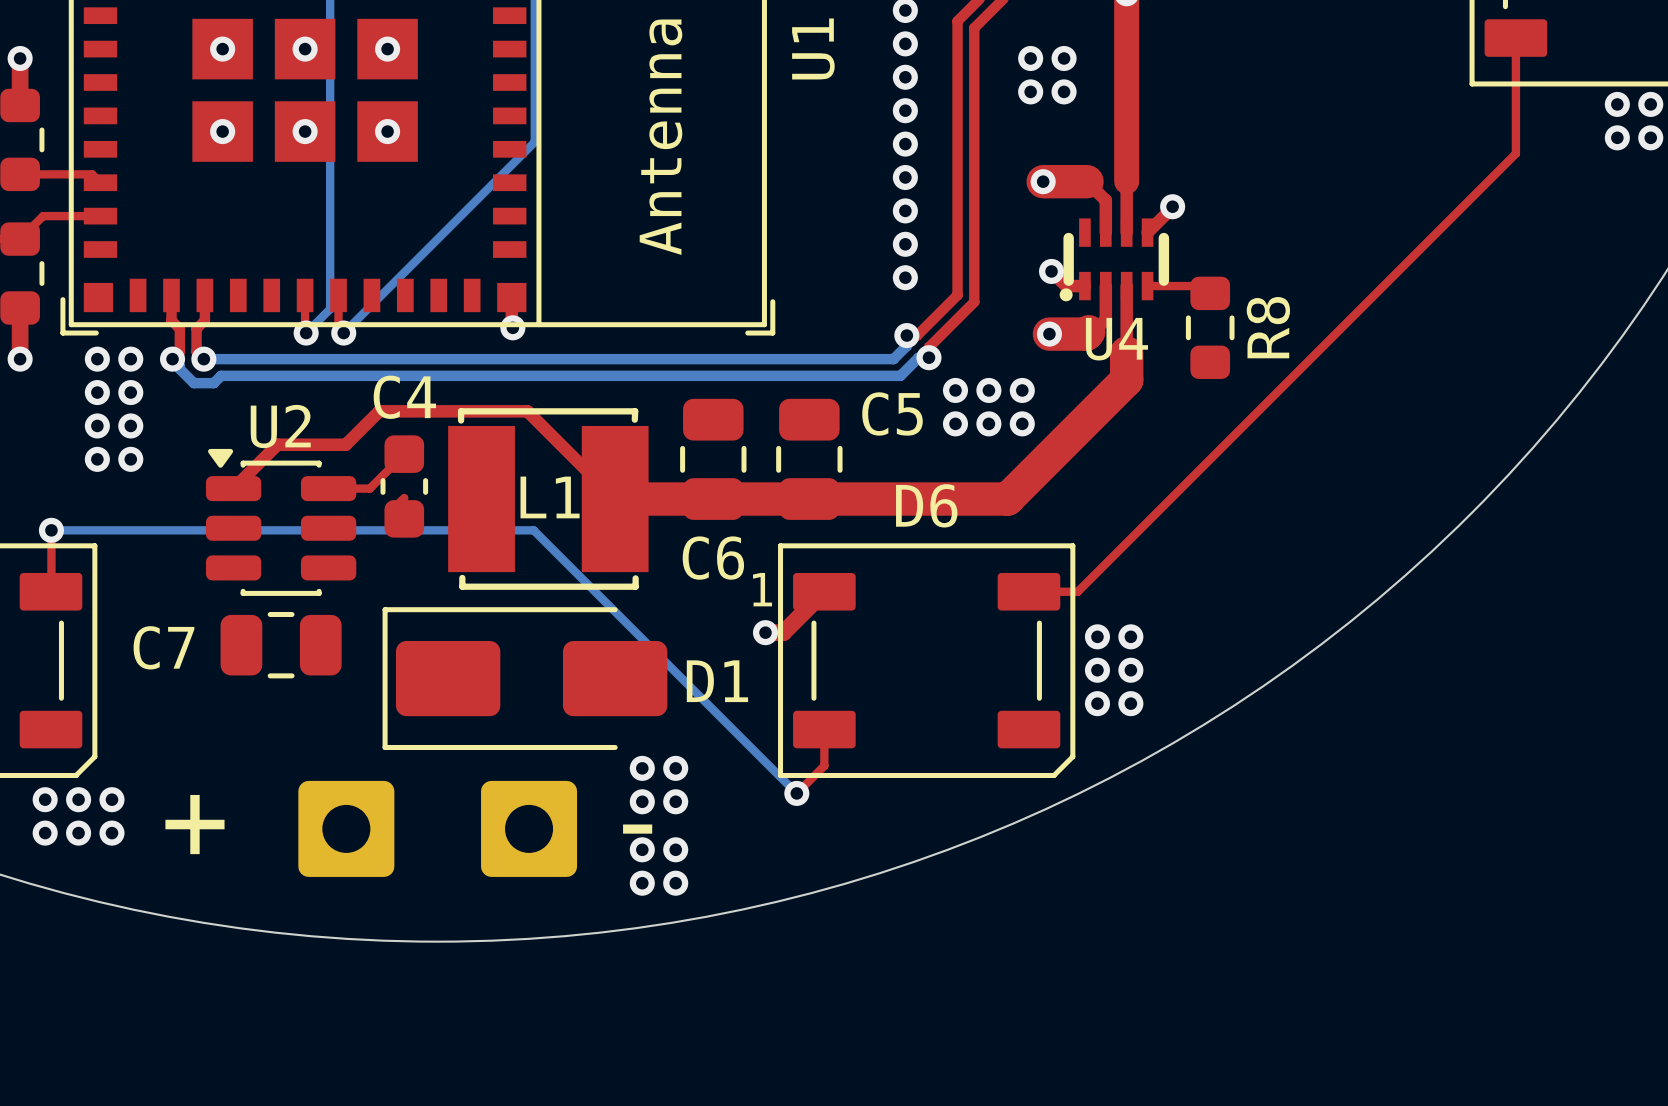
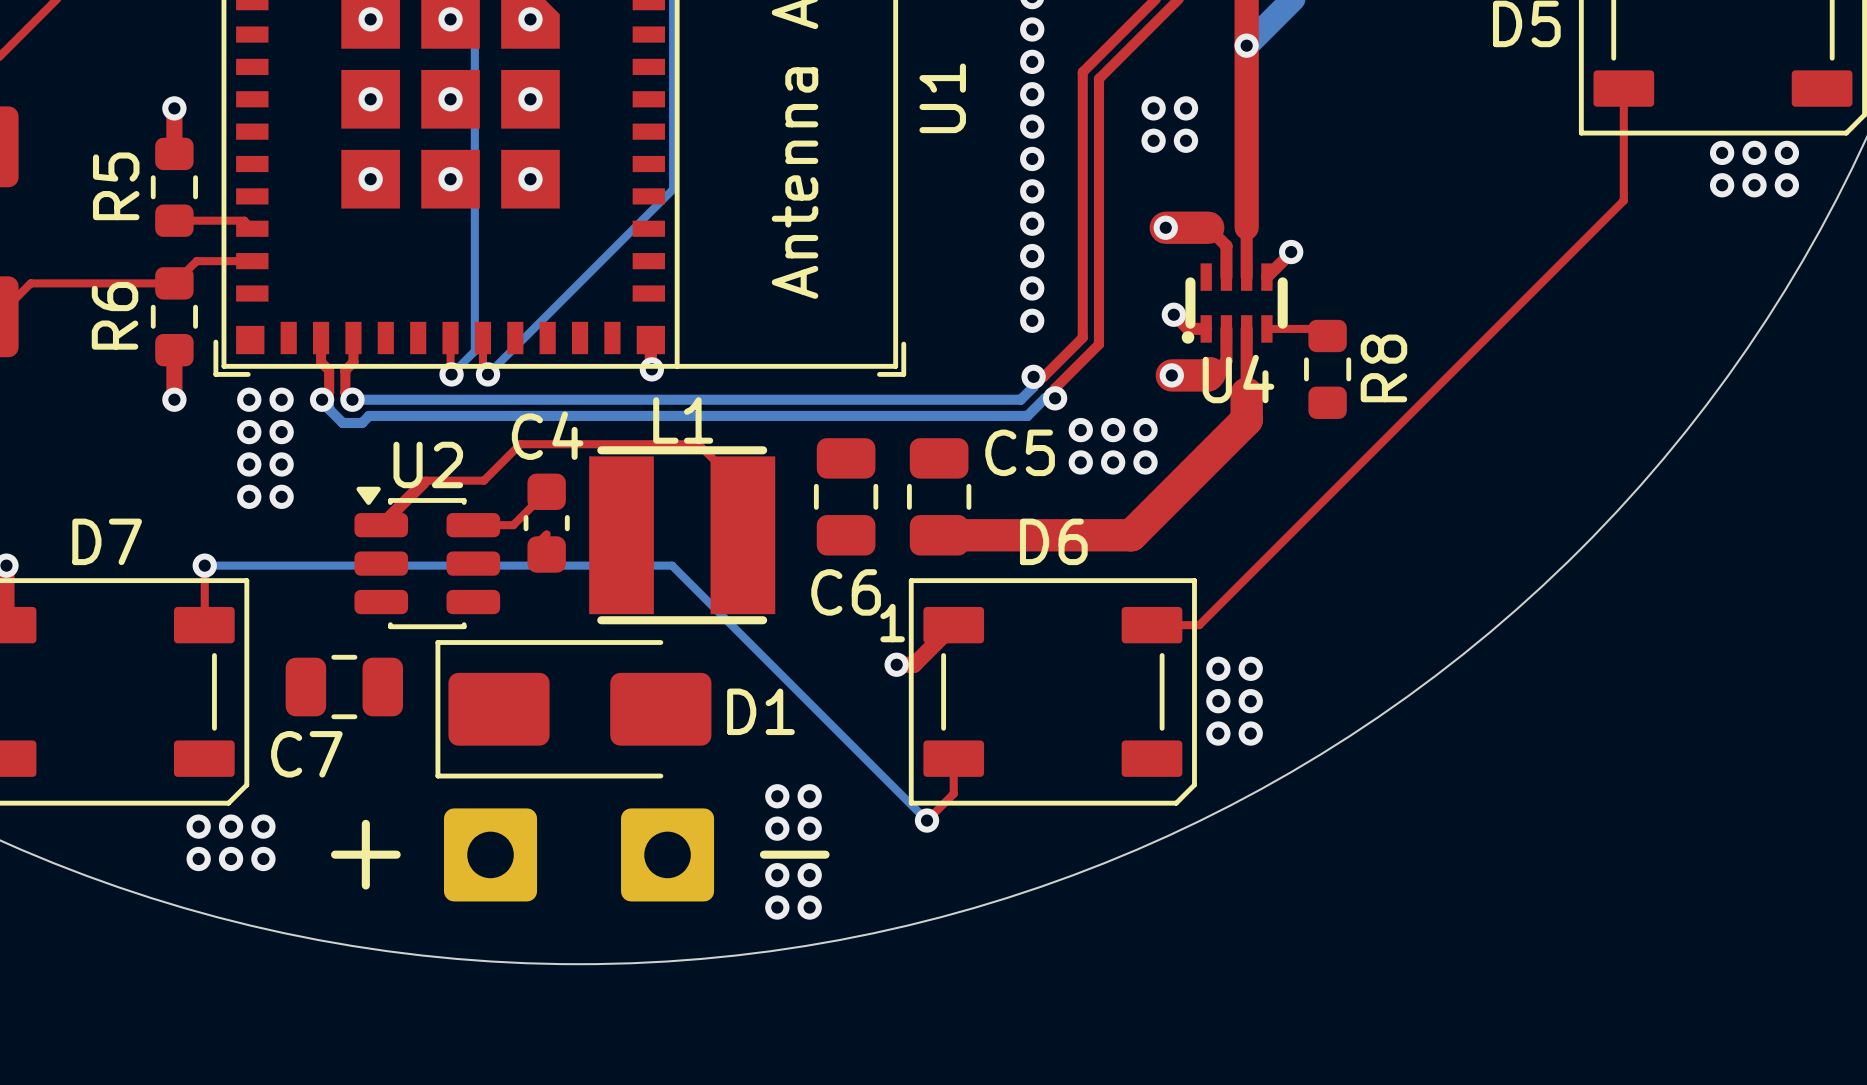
L1 footprint: [448, 408, 649, 590] -> [589, 446, 776, 625]
top track: (277, 444) (345, 444) (379, 411) (527, 411) (615, 499) (809, 499) -> (423, 482) (425, 480) (483, 480) (520, 444) (698, 444) (742, 488) (742, 535)
L1 name position: L1 (550, 497) -> L1 (683, 420)
C7 position: (281, 645) -> (344, 687)
C7 name position: C7 (163, 647) -> C7 (306, 754)
D1 position: (524, 678) -> (573, 709)

